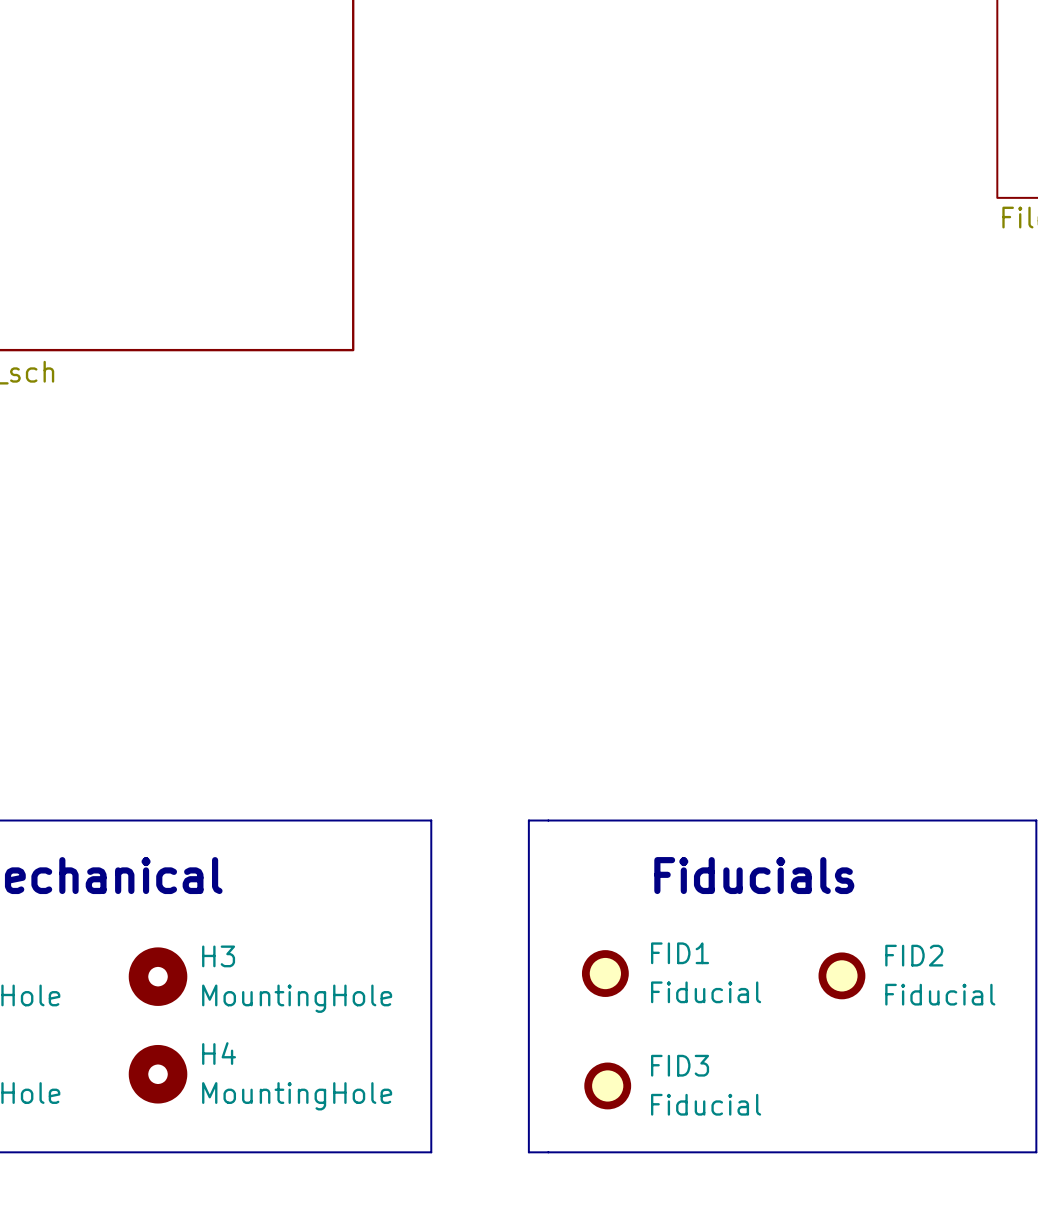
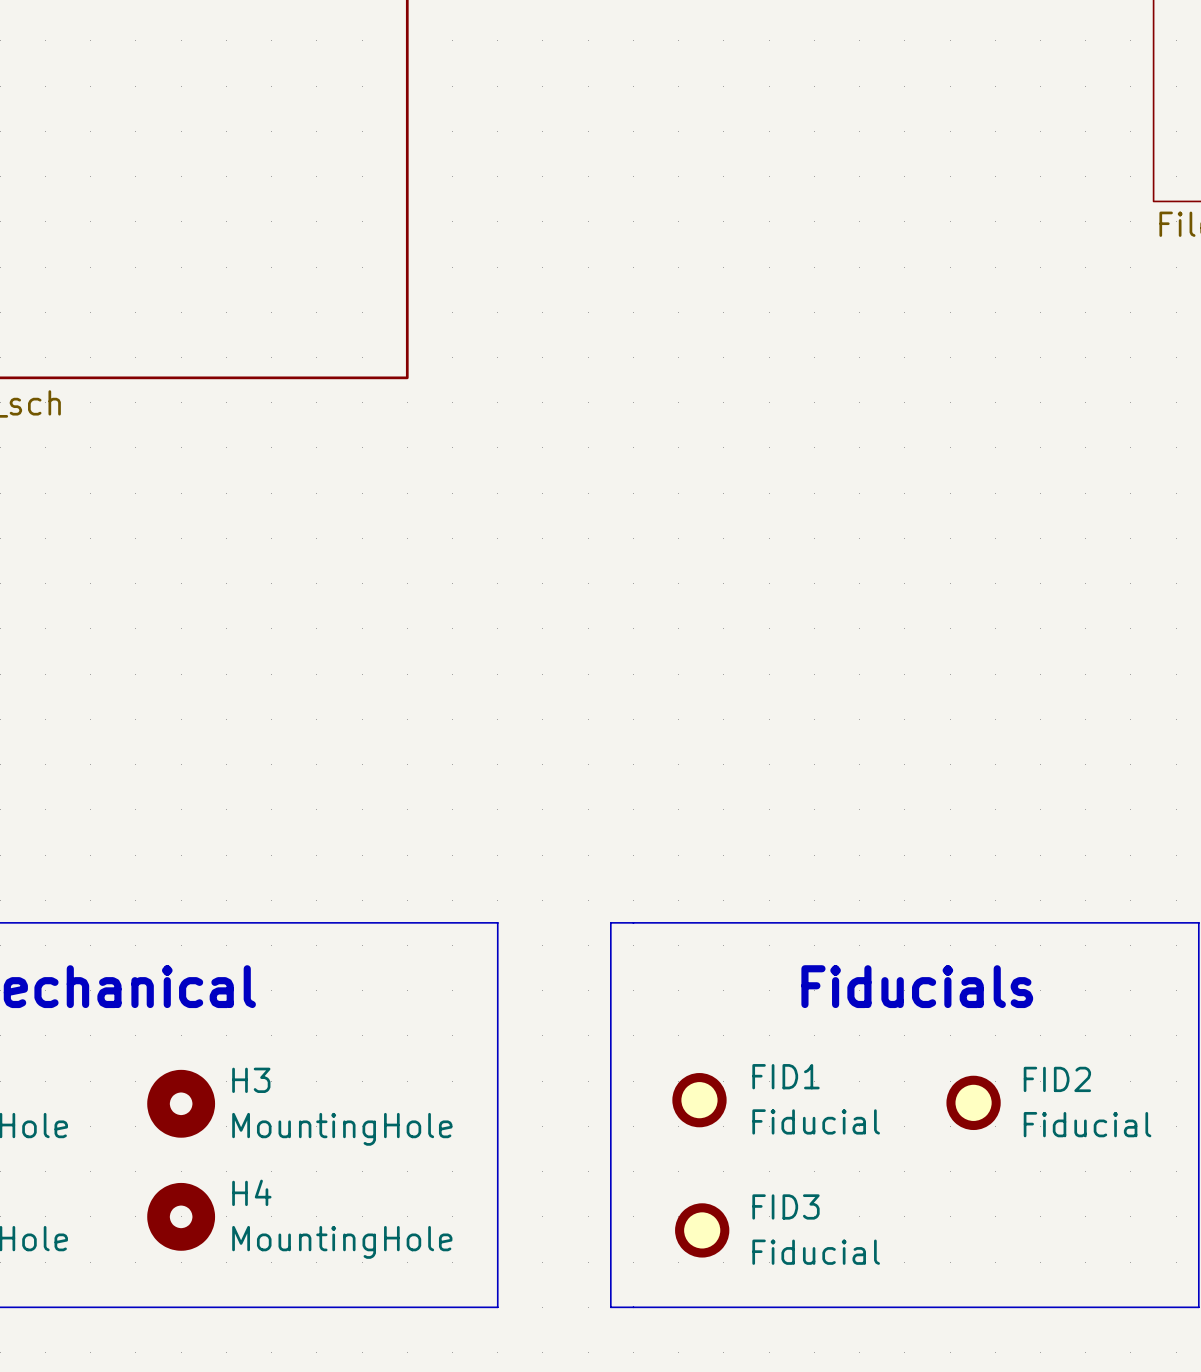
text position: Fiducials (754, 875) -> Fiducials (917, 986)

